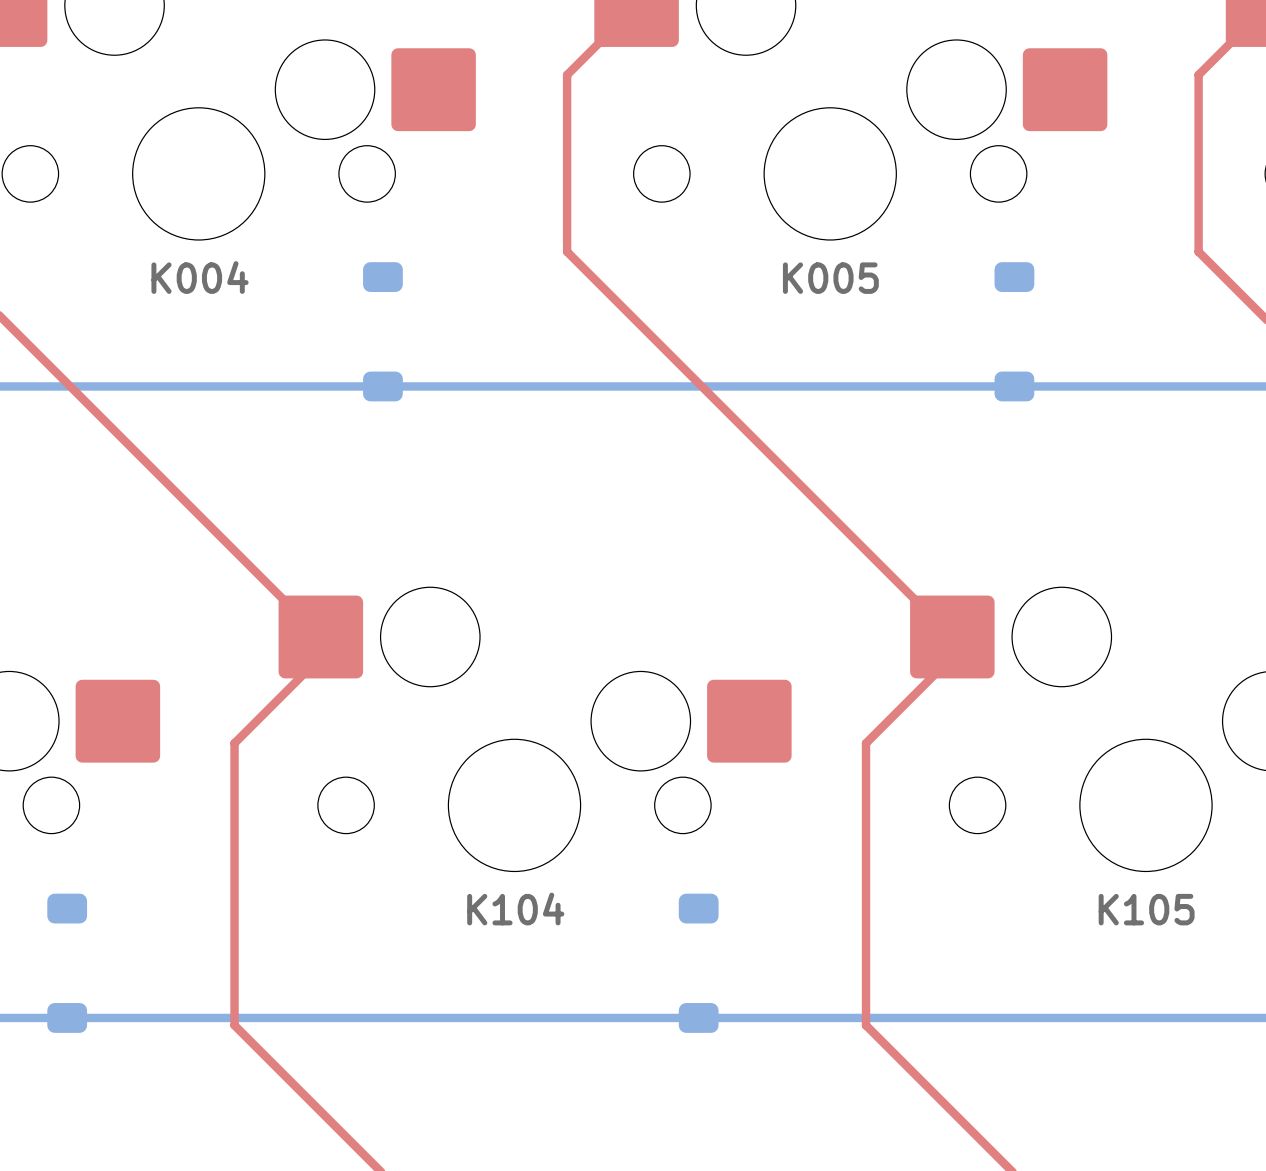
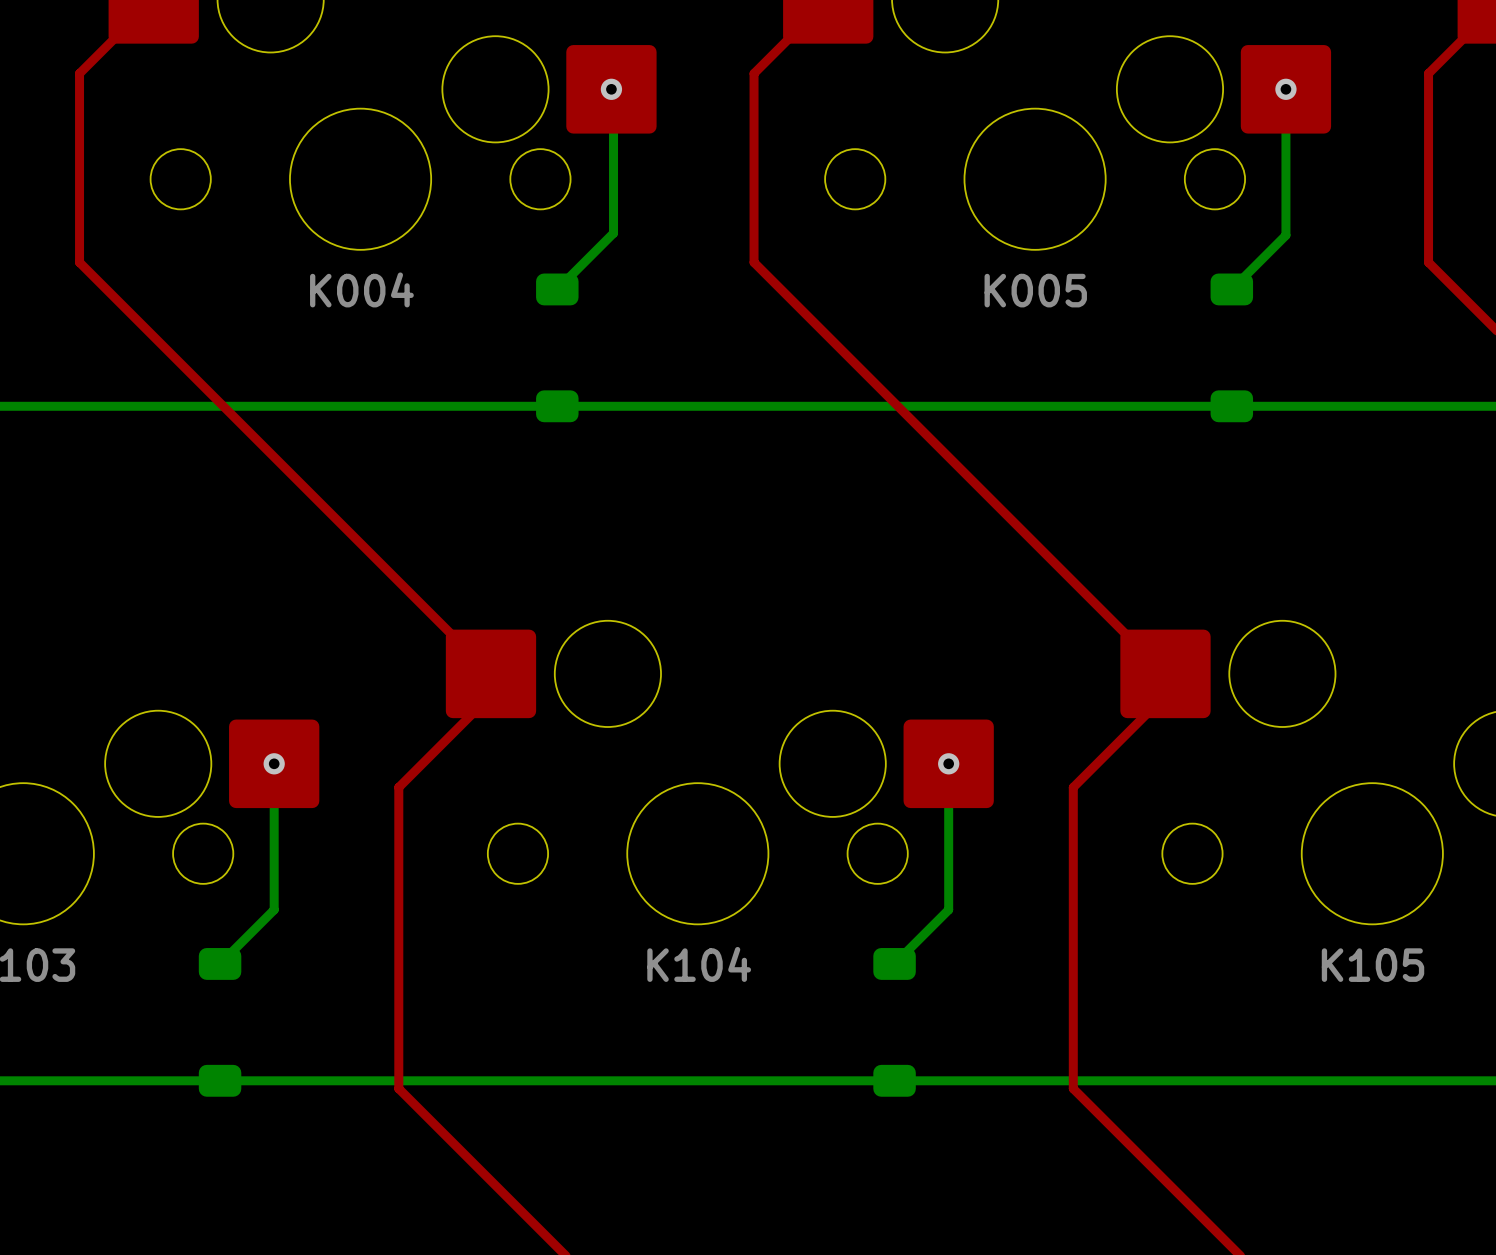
via: none -> (611, 89)
bottom track: none -> (1285, 89) (1285, 235) (1231, 289)
via: none -> (1285, 89)
bottom track: none -> (613, 94) (613, 233) (557, 289)
bottom track: none -> (274, 763) (274, 909) (220, 963)
via: none -> (274, 763)
bottom track: none -> (948, 763) (948, 909) (894, 963)
via: none -> (948, 763)

